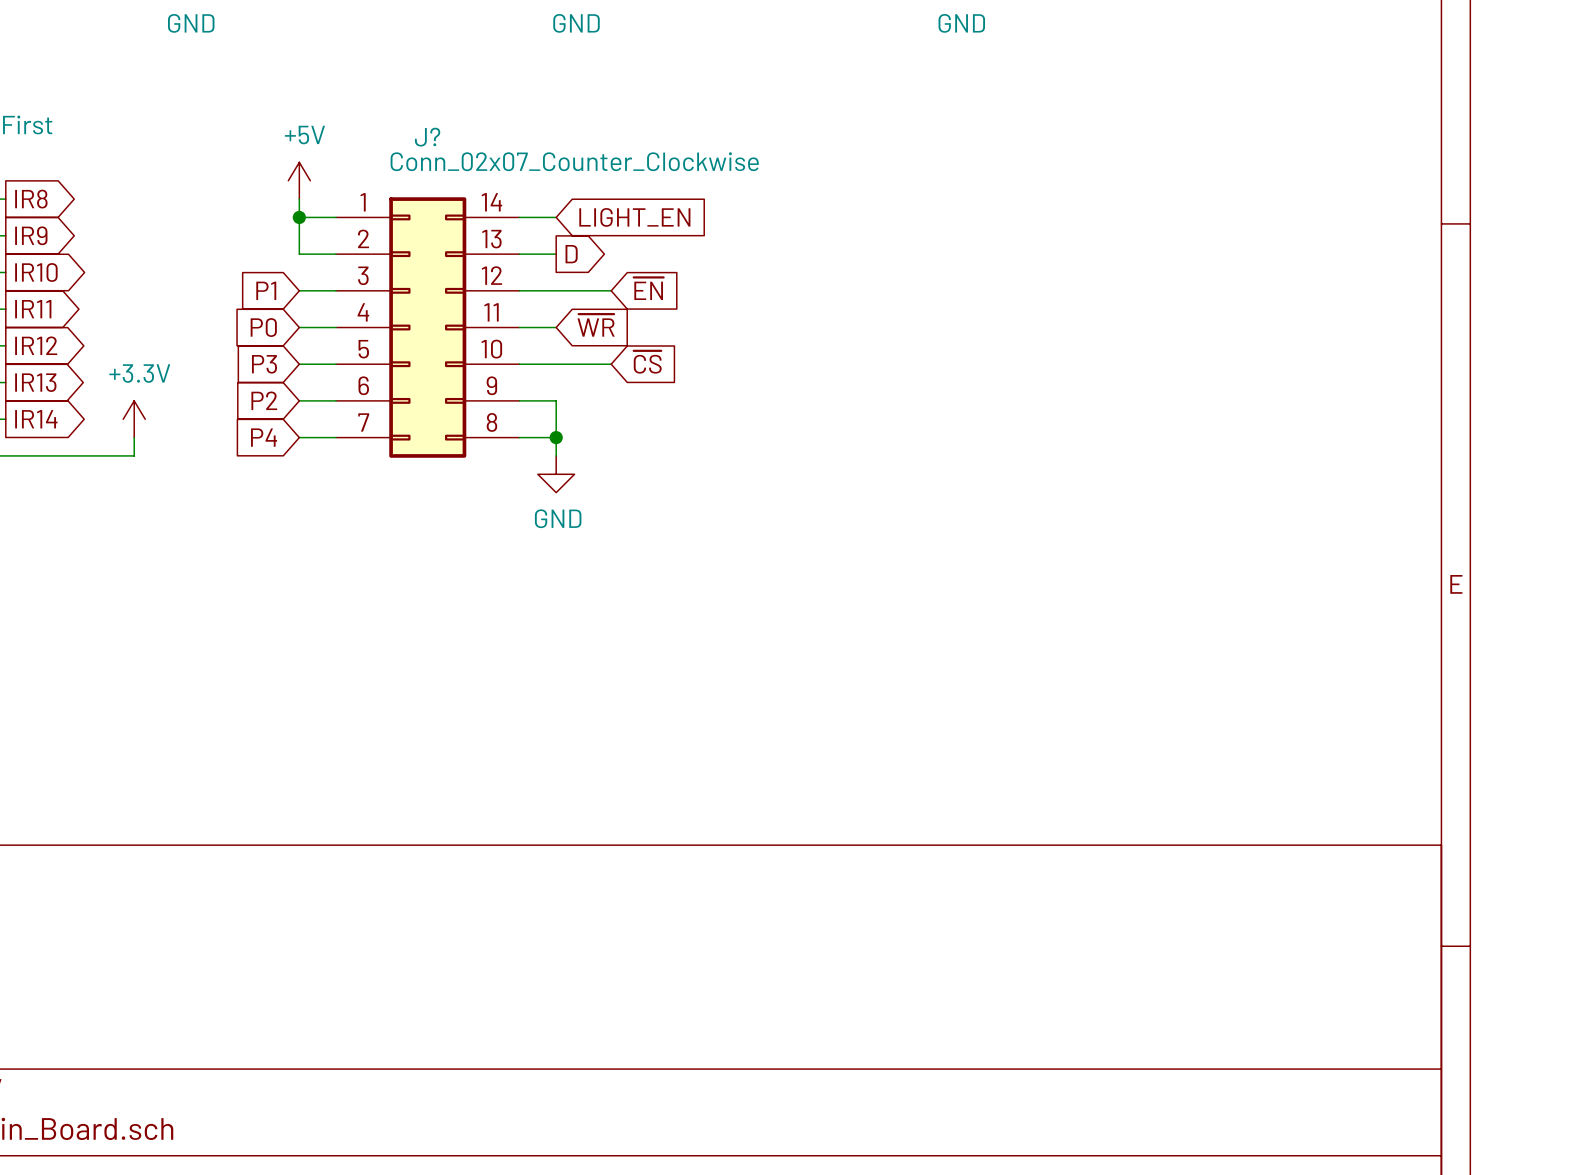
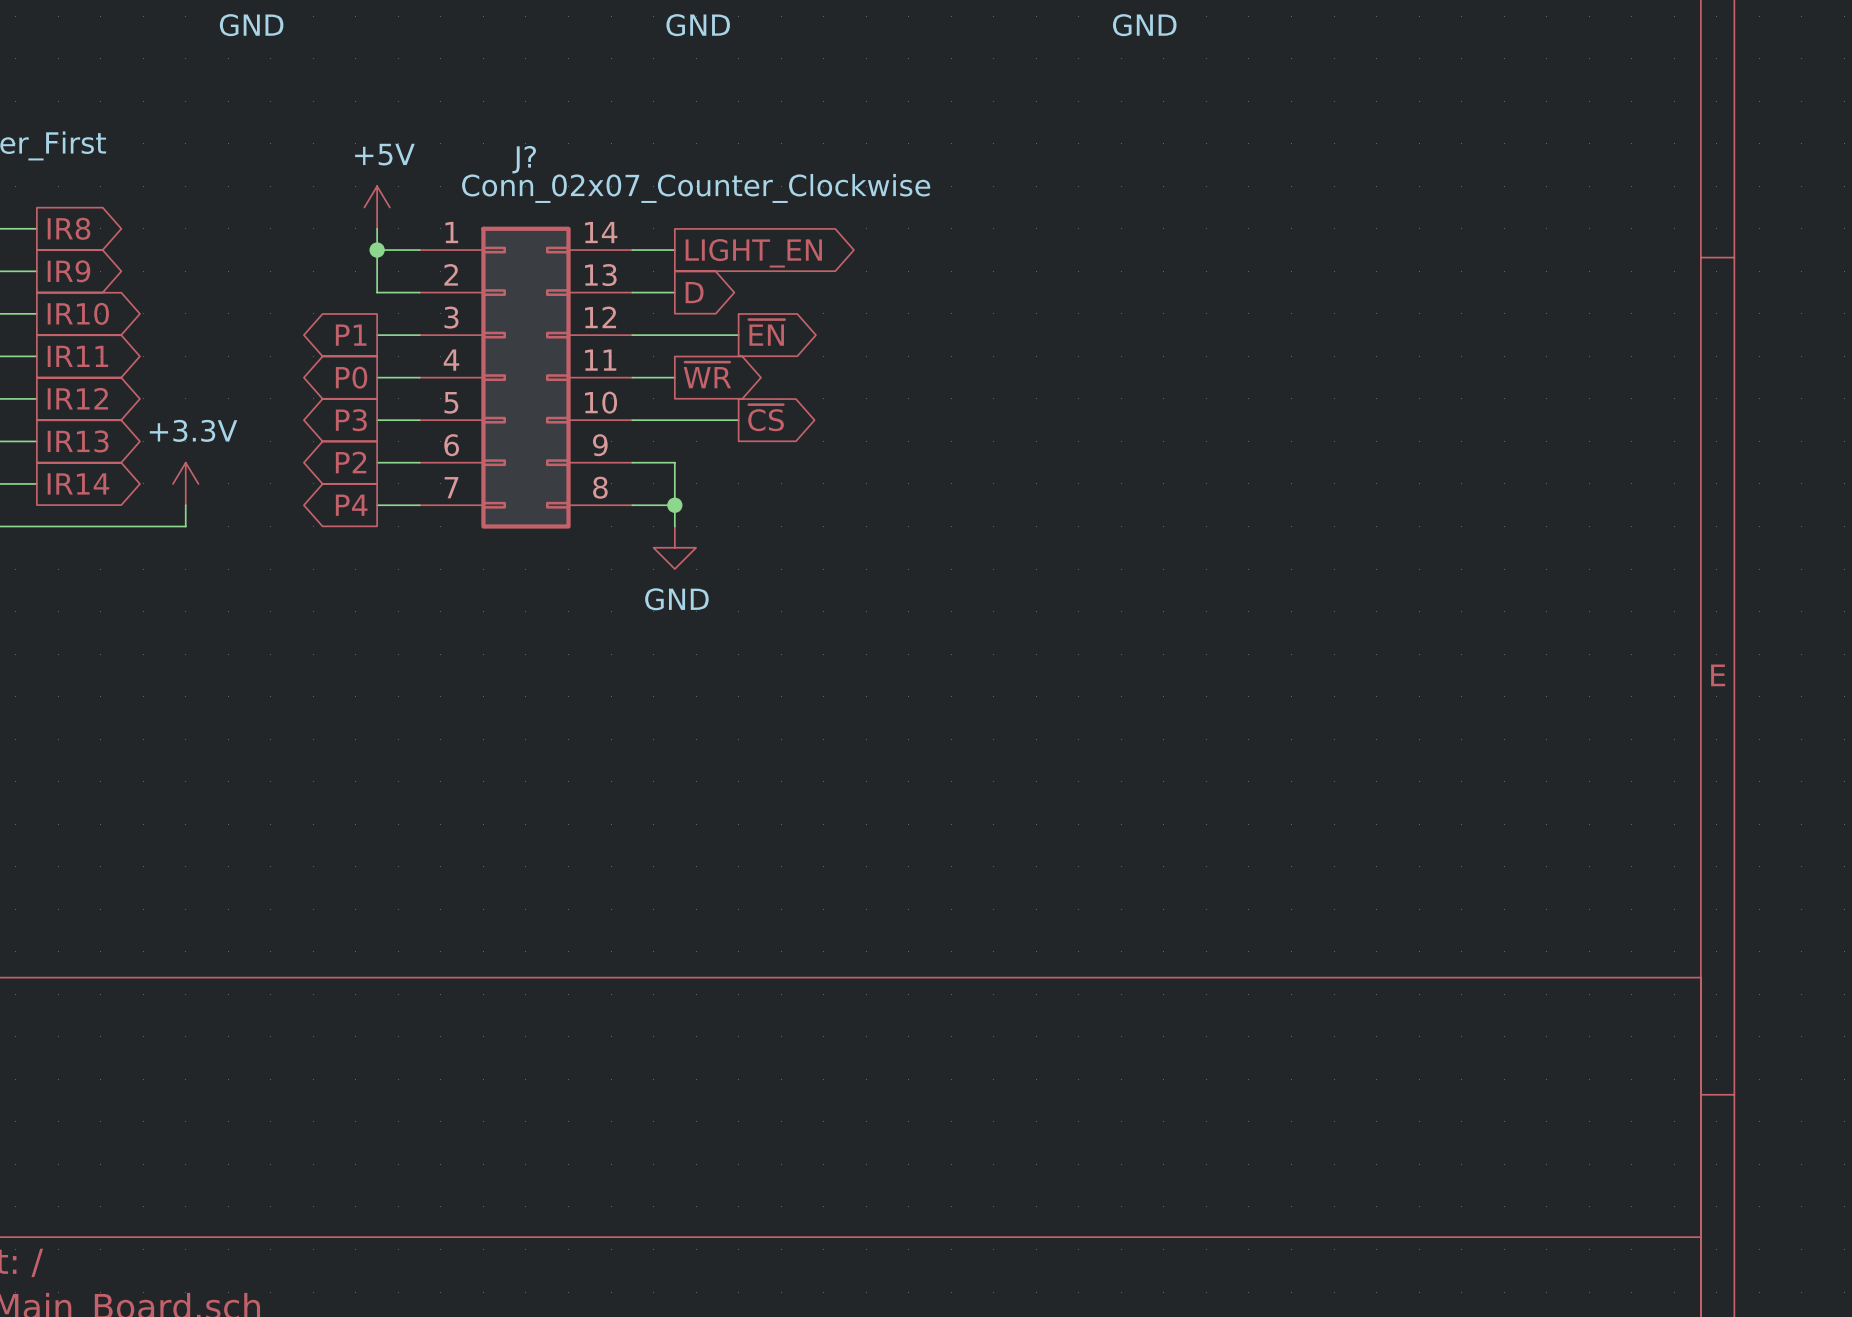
global label shape: input (634, 217) -> output (753, 253)
global label shape: input (648, 288) -> output (766, 332)
global label shape: input (266, 290) -> output (351, 335)
global label shape: input (596, 325) -> output (707, 375)
global label shape: input (263, 327) -> output (351, 377)
global label shape: input (647, 362) -> output (766, 417)
global label shape: input (264, 364) -> output (351, 420)
global label shape: input (264, 400) -> output (351, 462)
global label shape: input (264, 437) -> output (351, 505)

